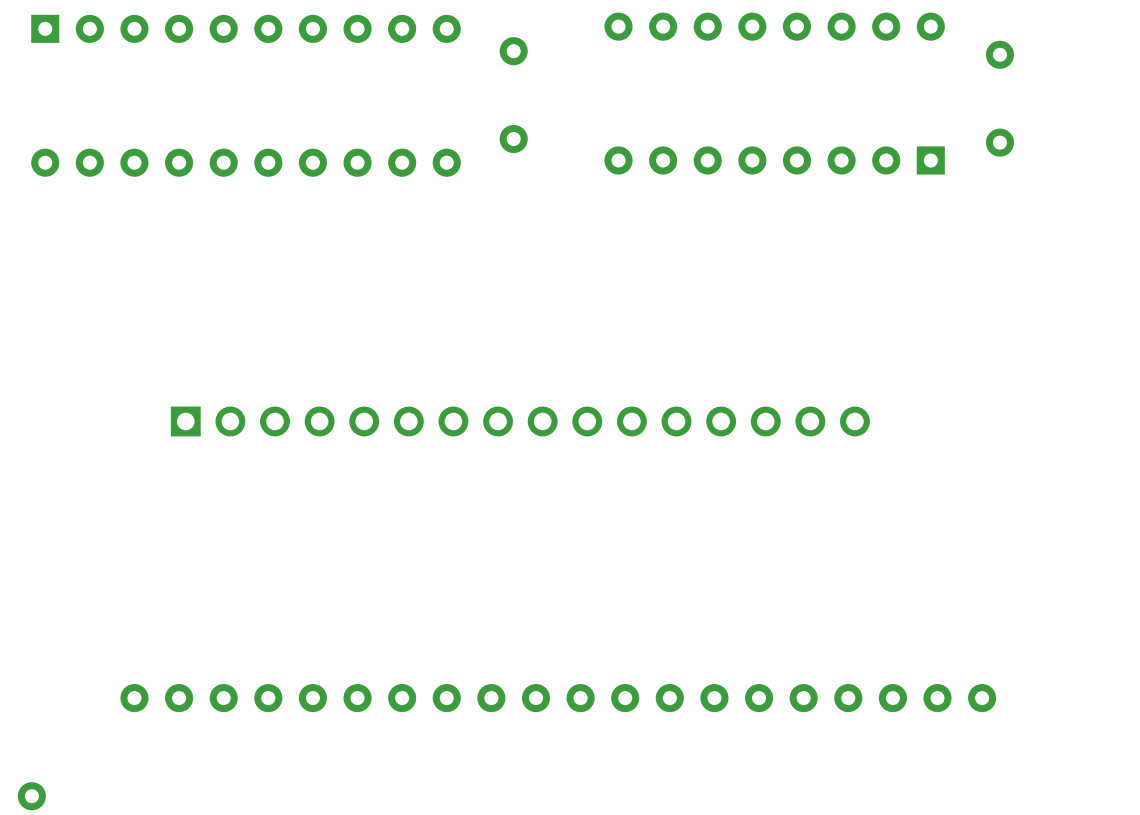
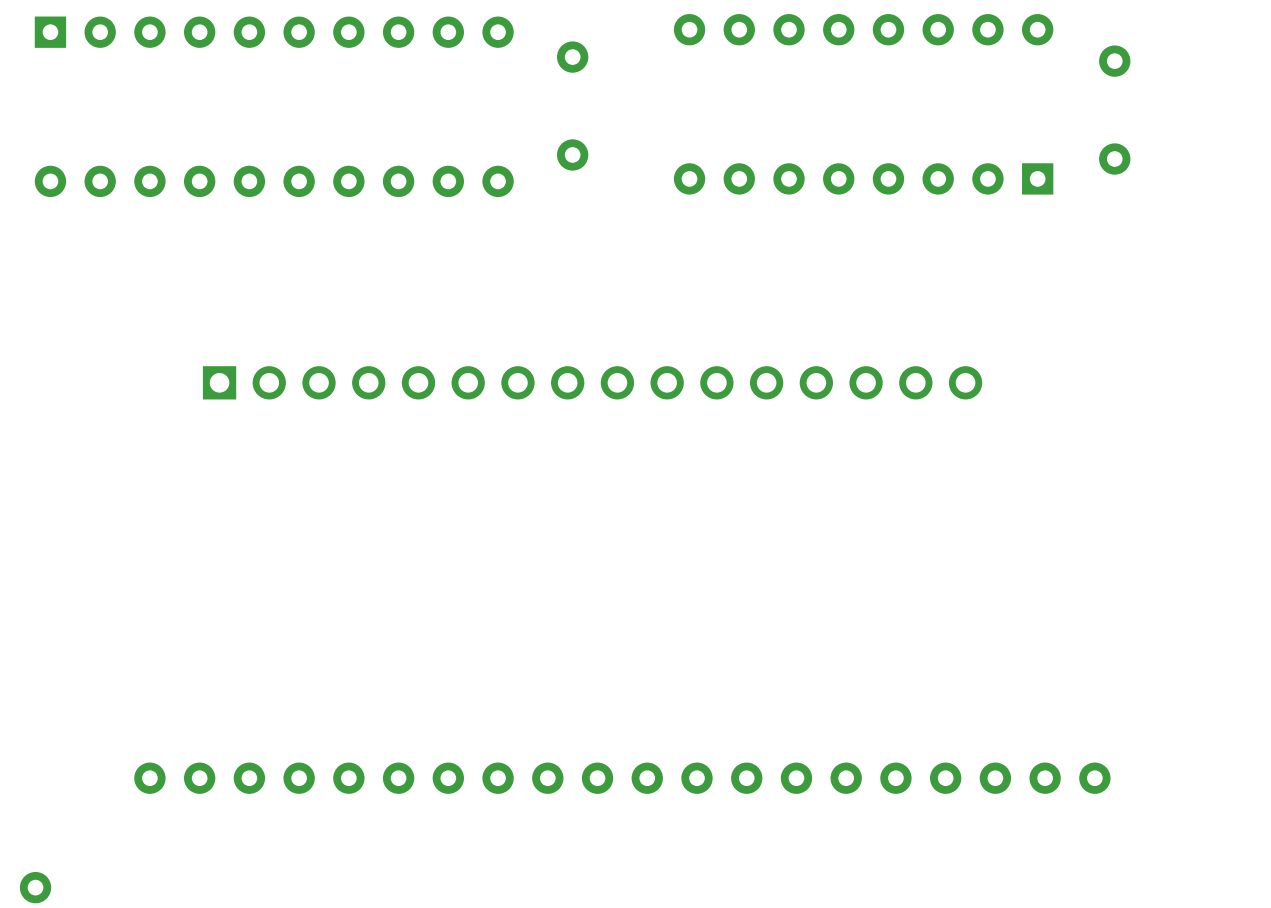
part position: (520, 421) -> (592, 382)

